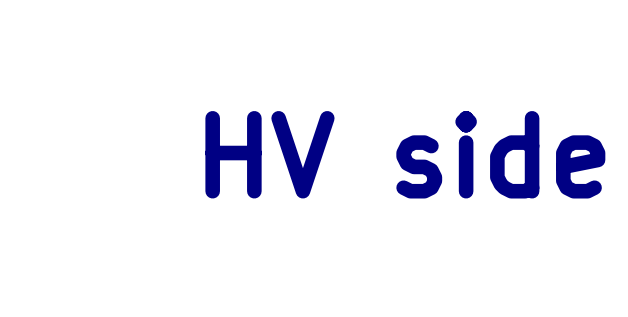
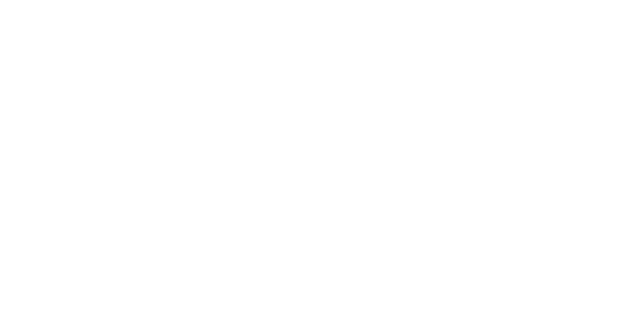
text: HV side (405, 154) -> none

